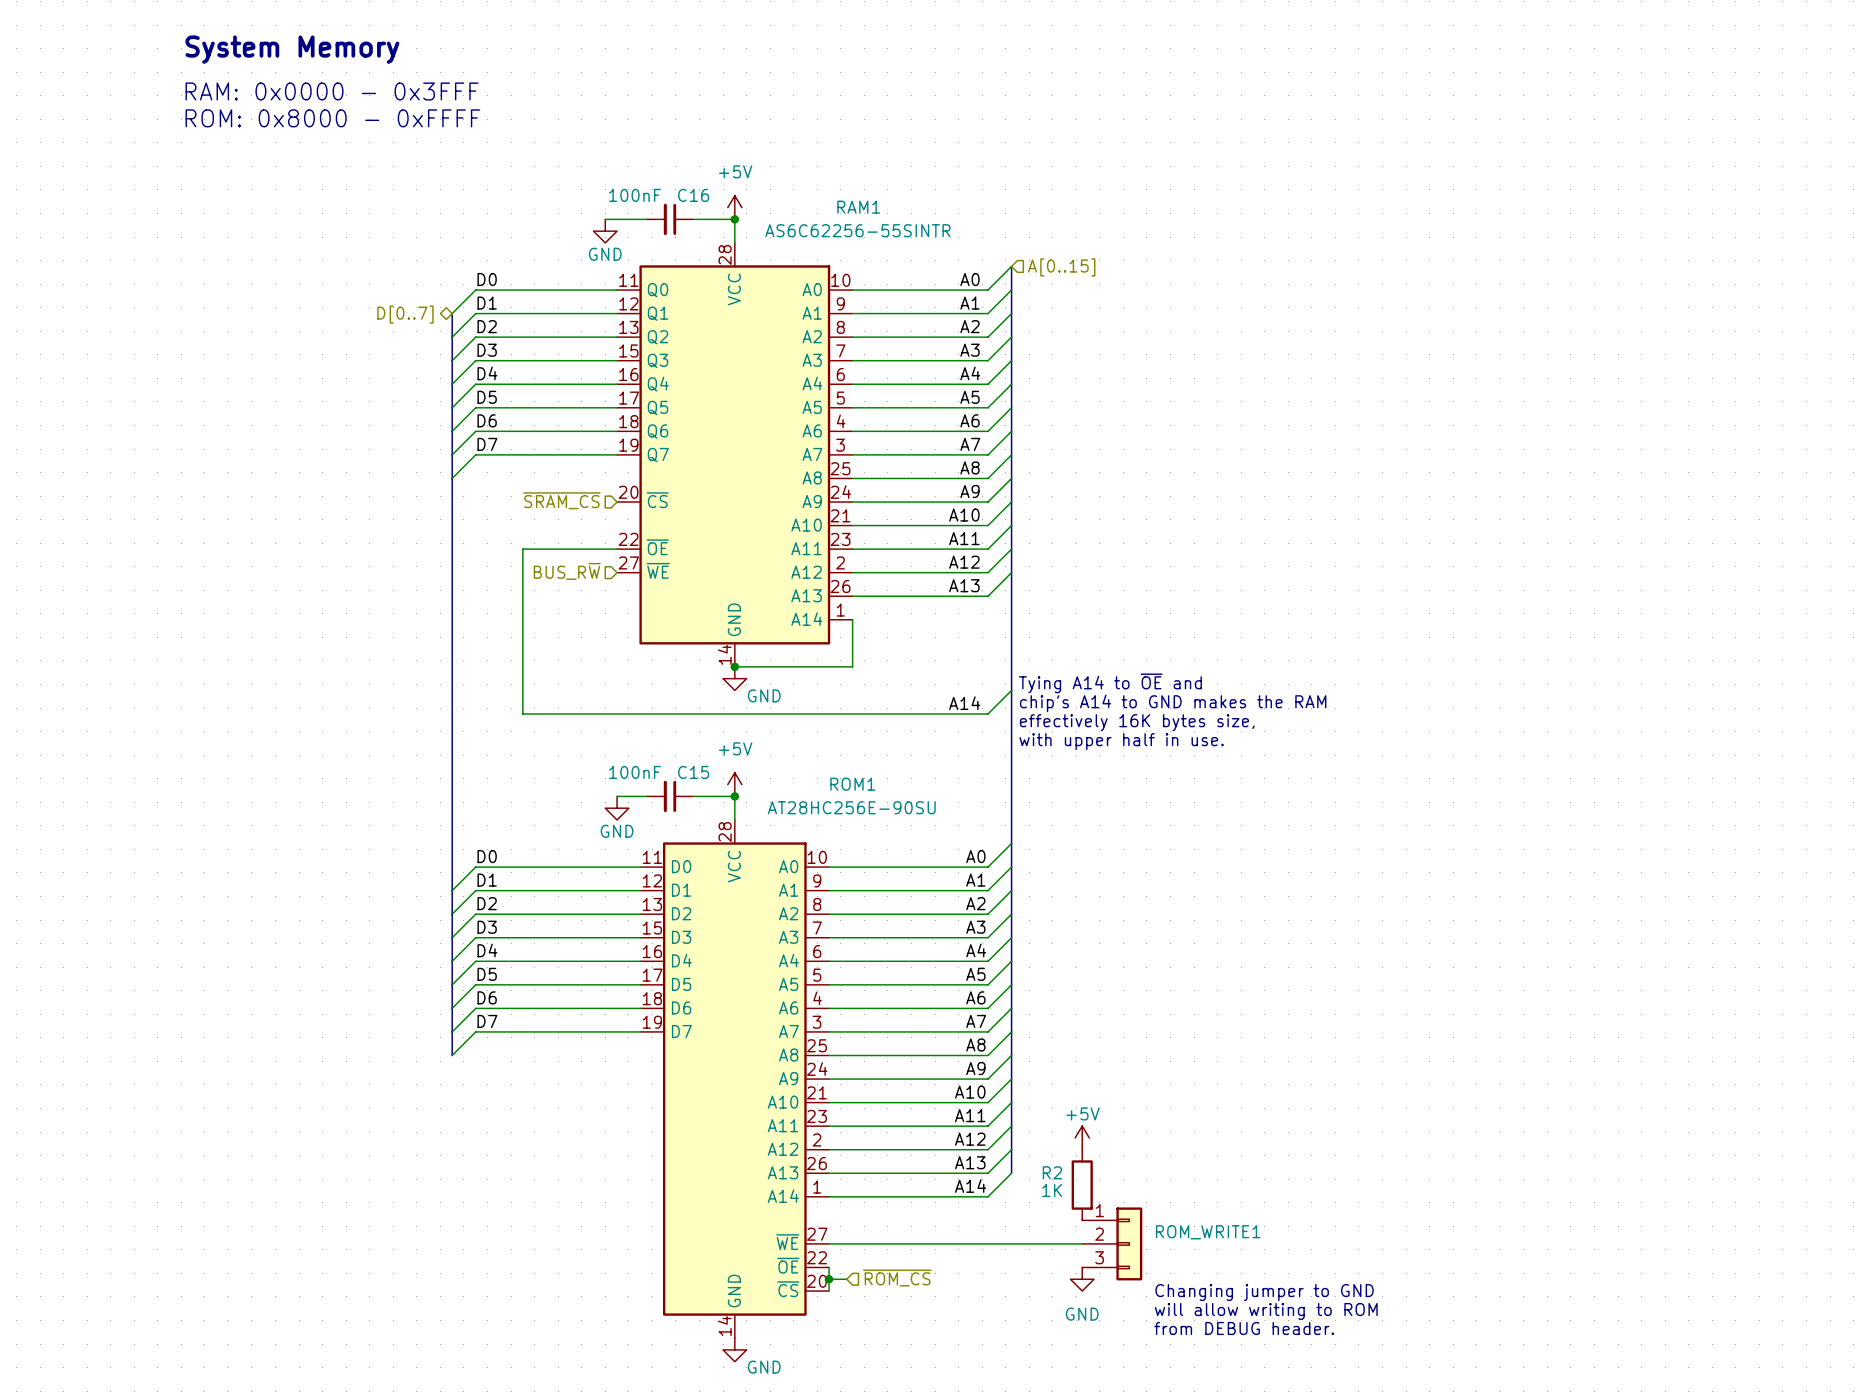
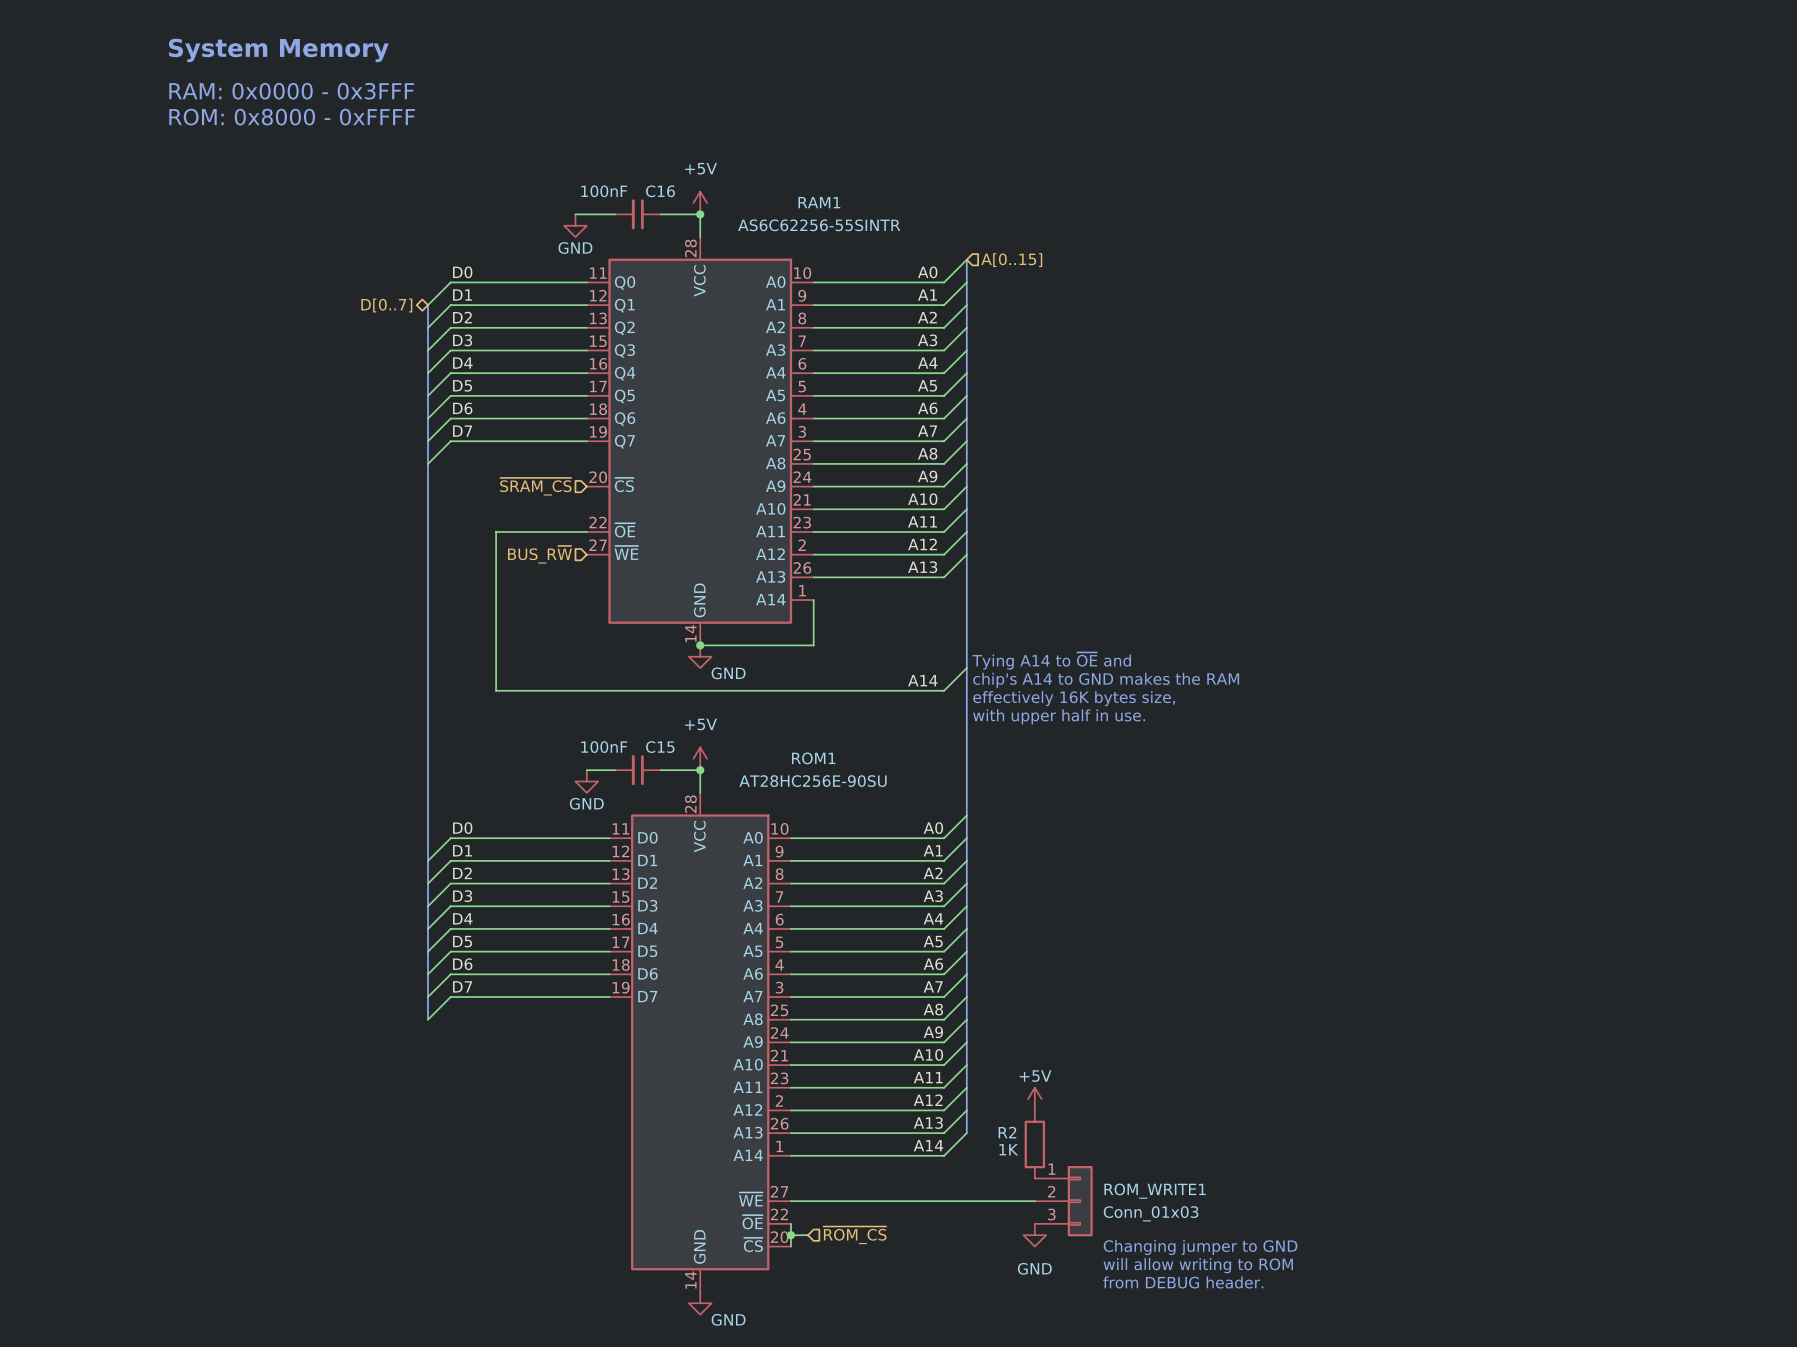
ROM_WRITE1 value: none -> Conn_01x03 (1151, 1213)

